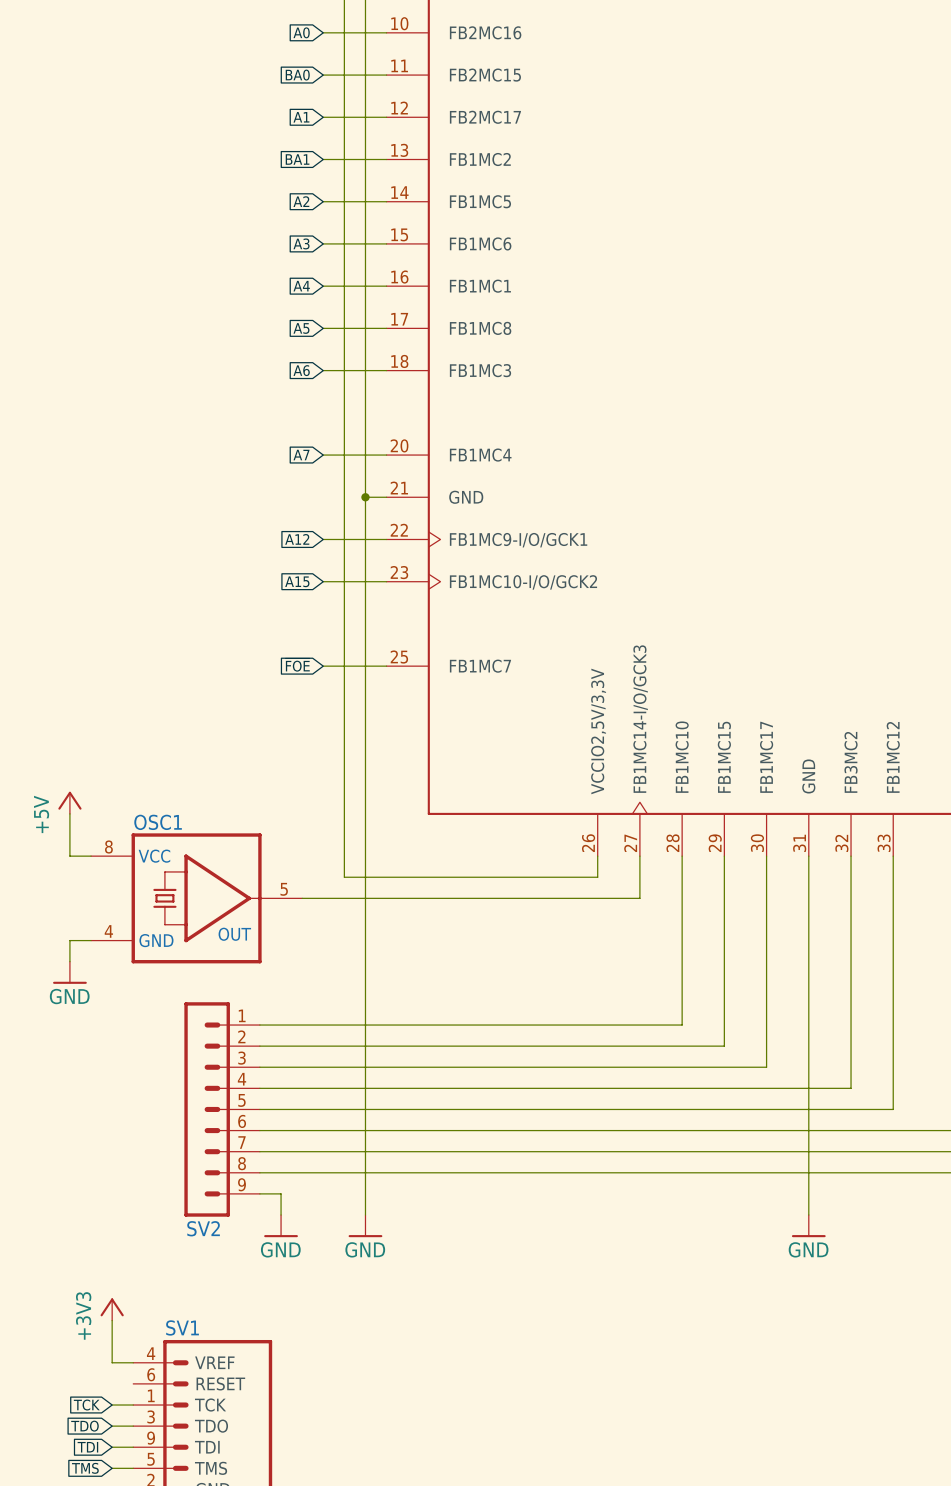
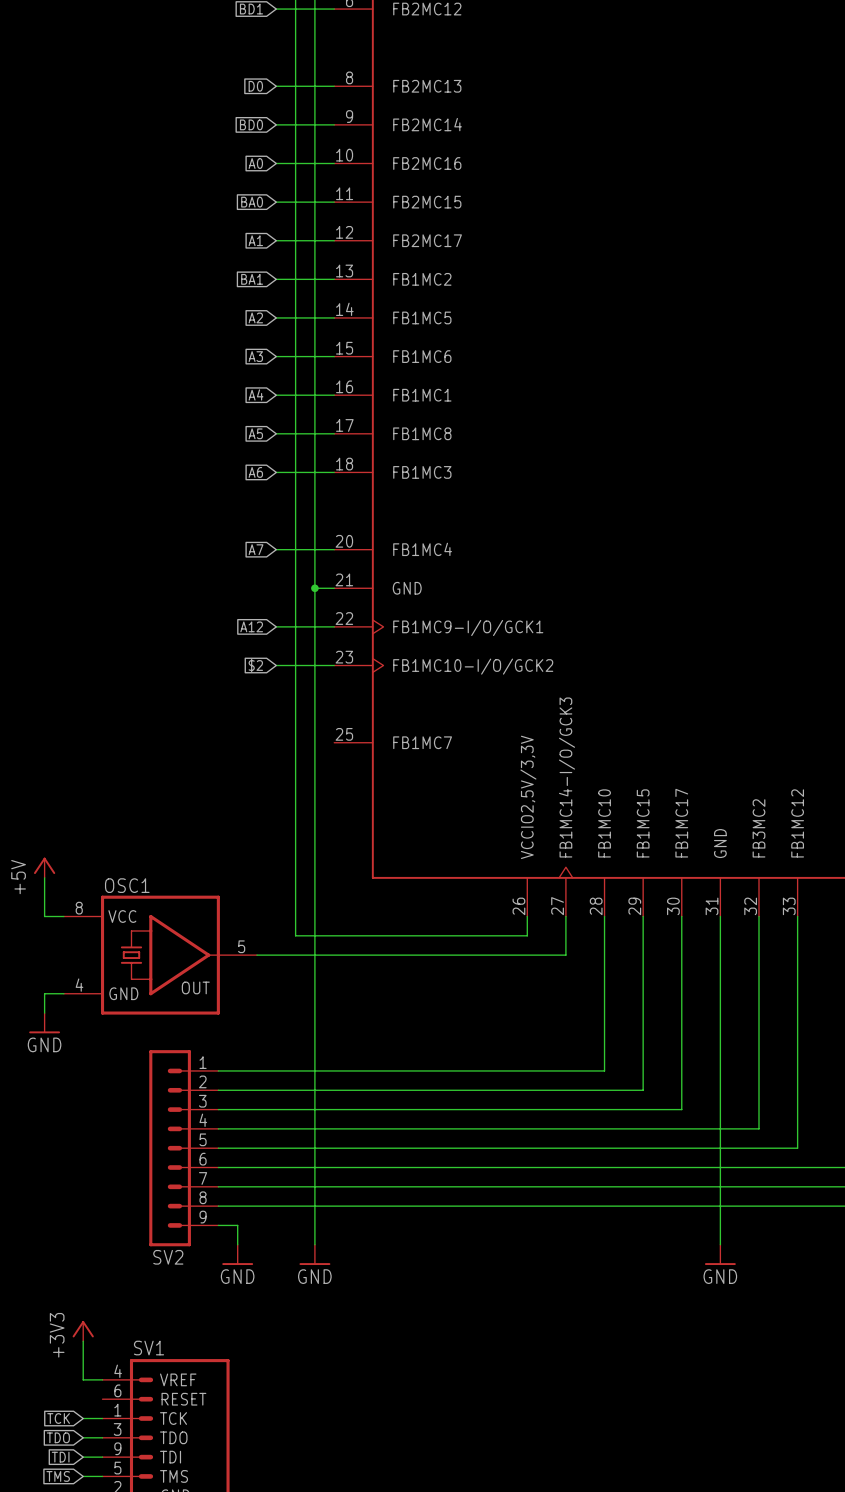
global label: A15 (297, 581) -> $2 (255, 665)
global label: ~{FOE} (297, 665) -> none
wire: (323, 666) (386, 666) -> none

